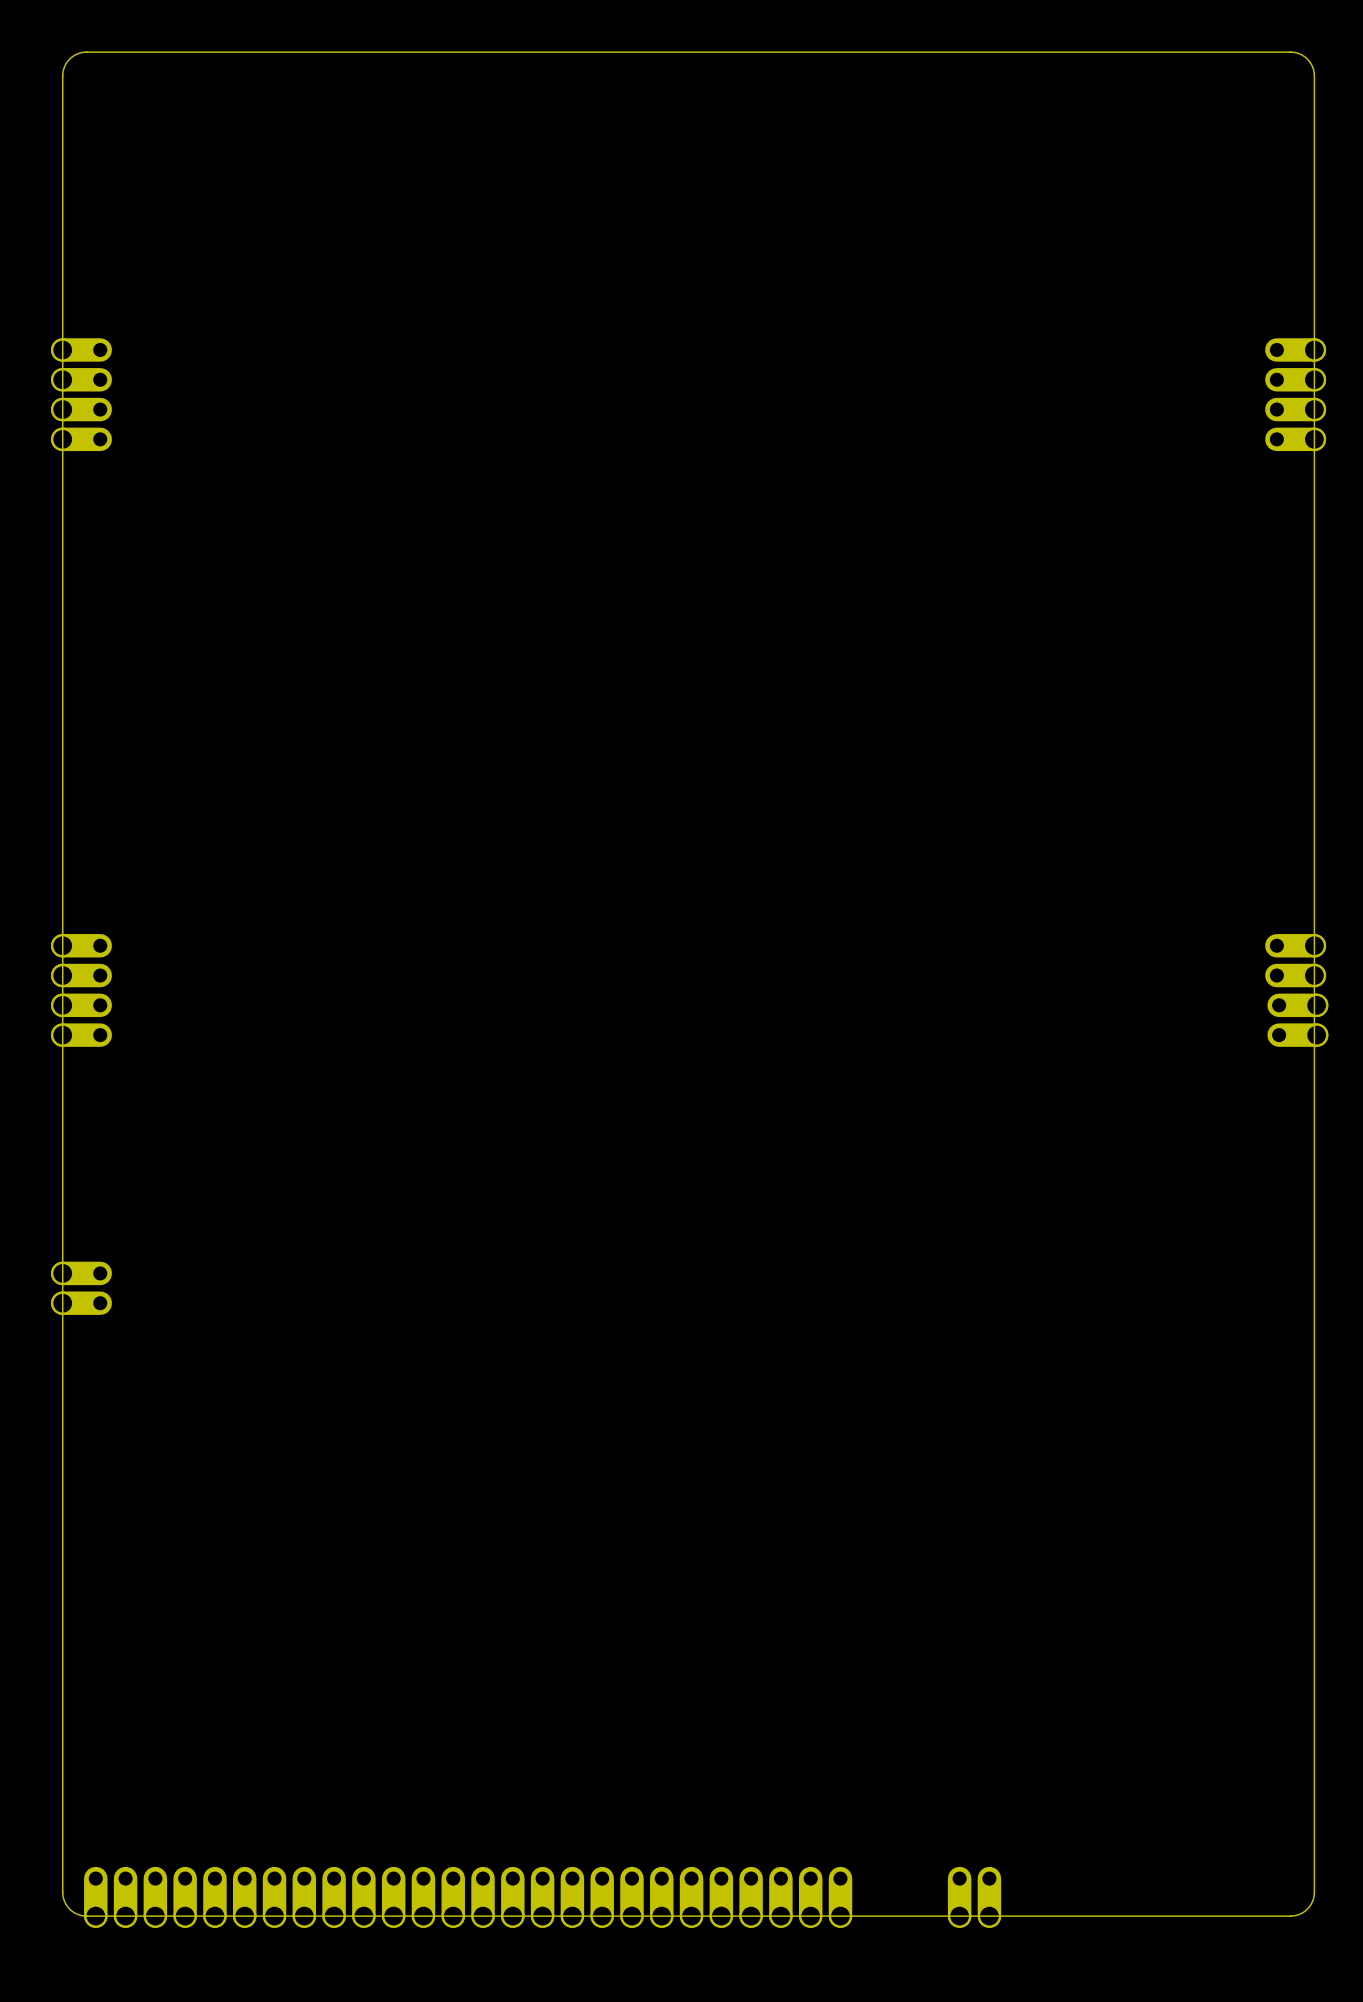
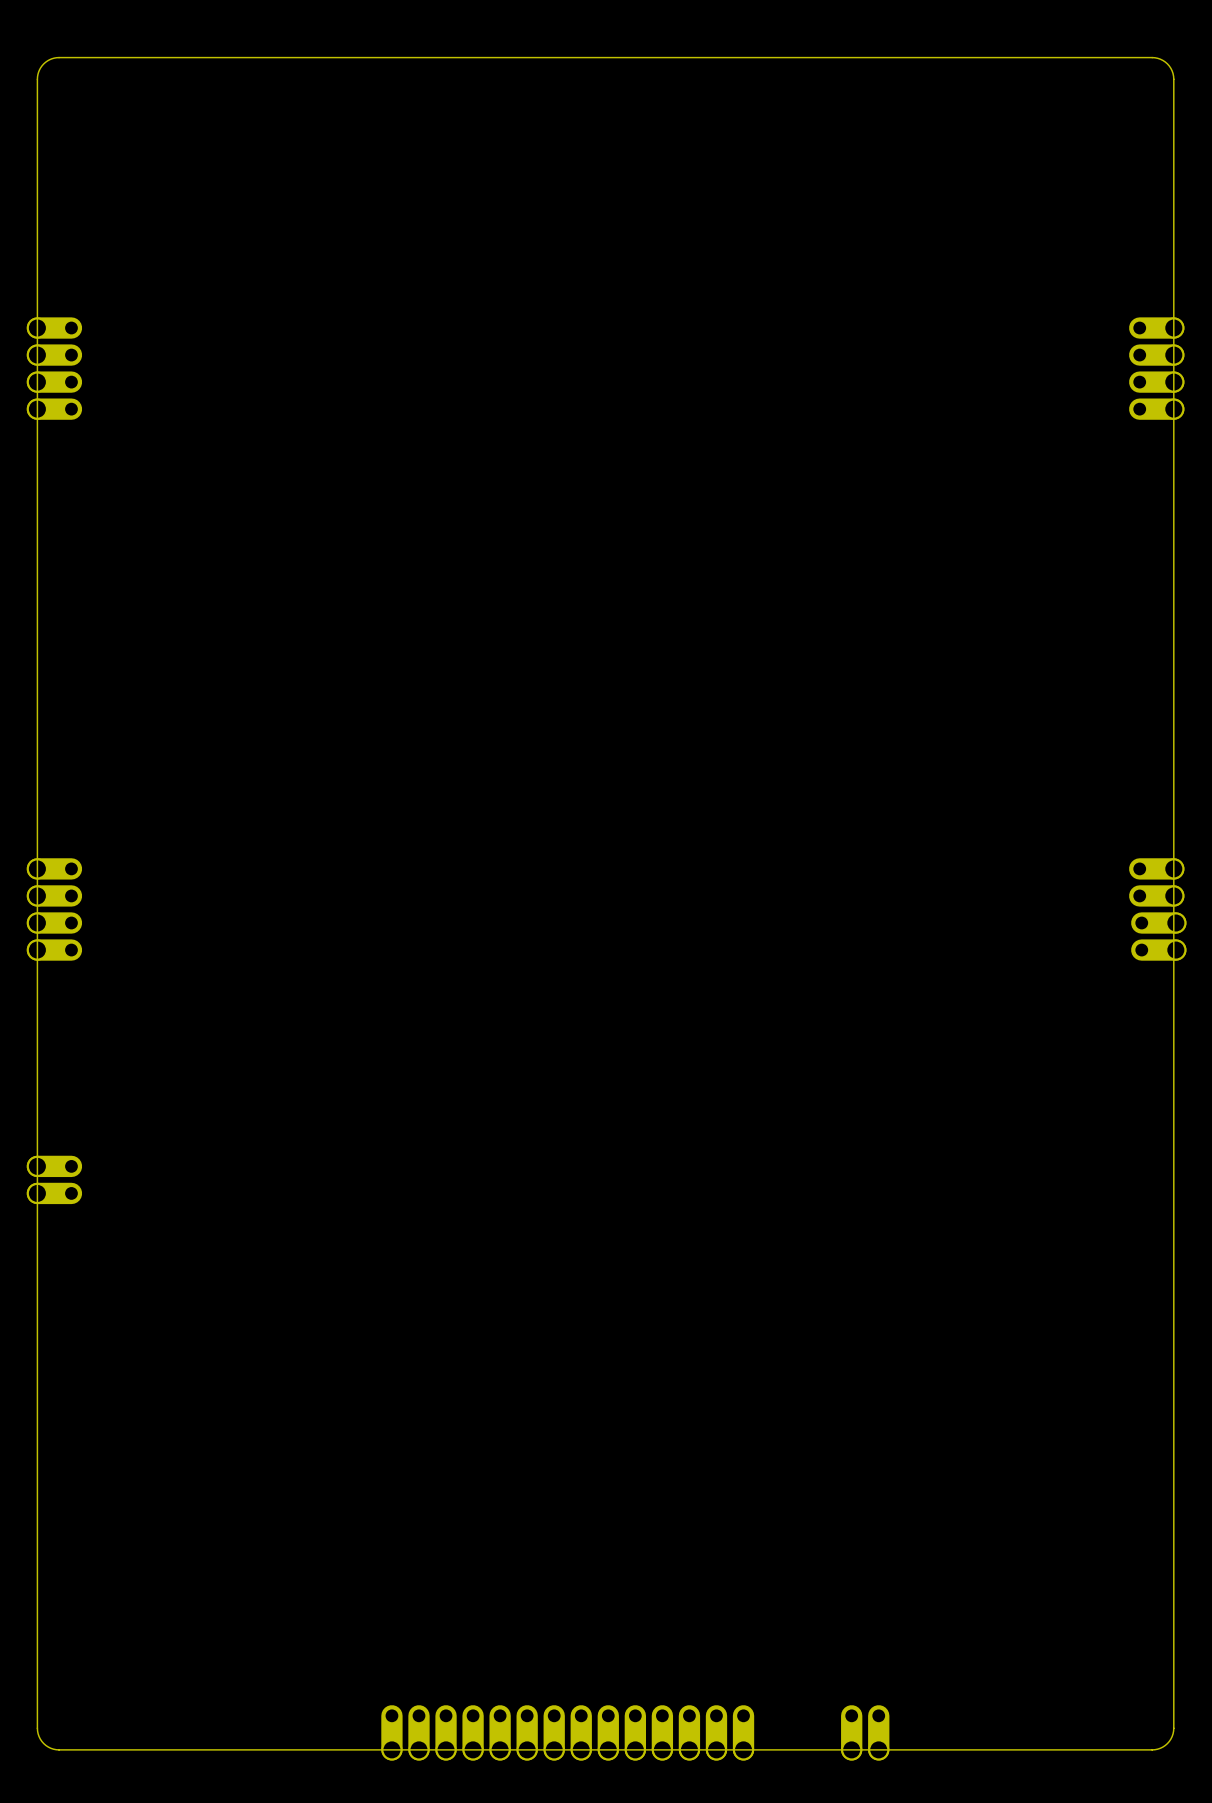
part: (95, 1897) -> none
part: (125, 1897) -> none
part: (155, 1897) -> none
part: (185, 1897) -> none
part: (214, 1897) -> none
part: (244, 1897) -> none
part: (274, 1897) -> none
part: (304, 1897) -> none
part: (334, 1897) -> none
part: (363, 1897) -> none
part: (393, 1897) -> none
part: (423, 1897) -> none

